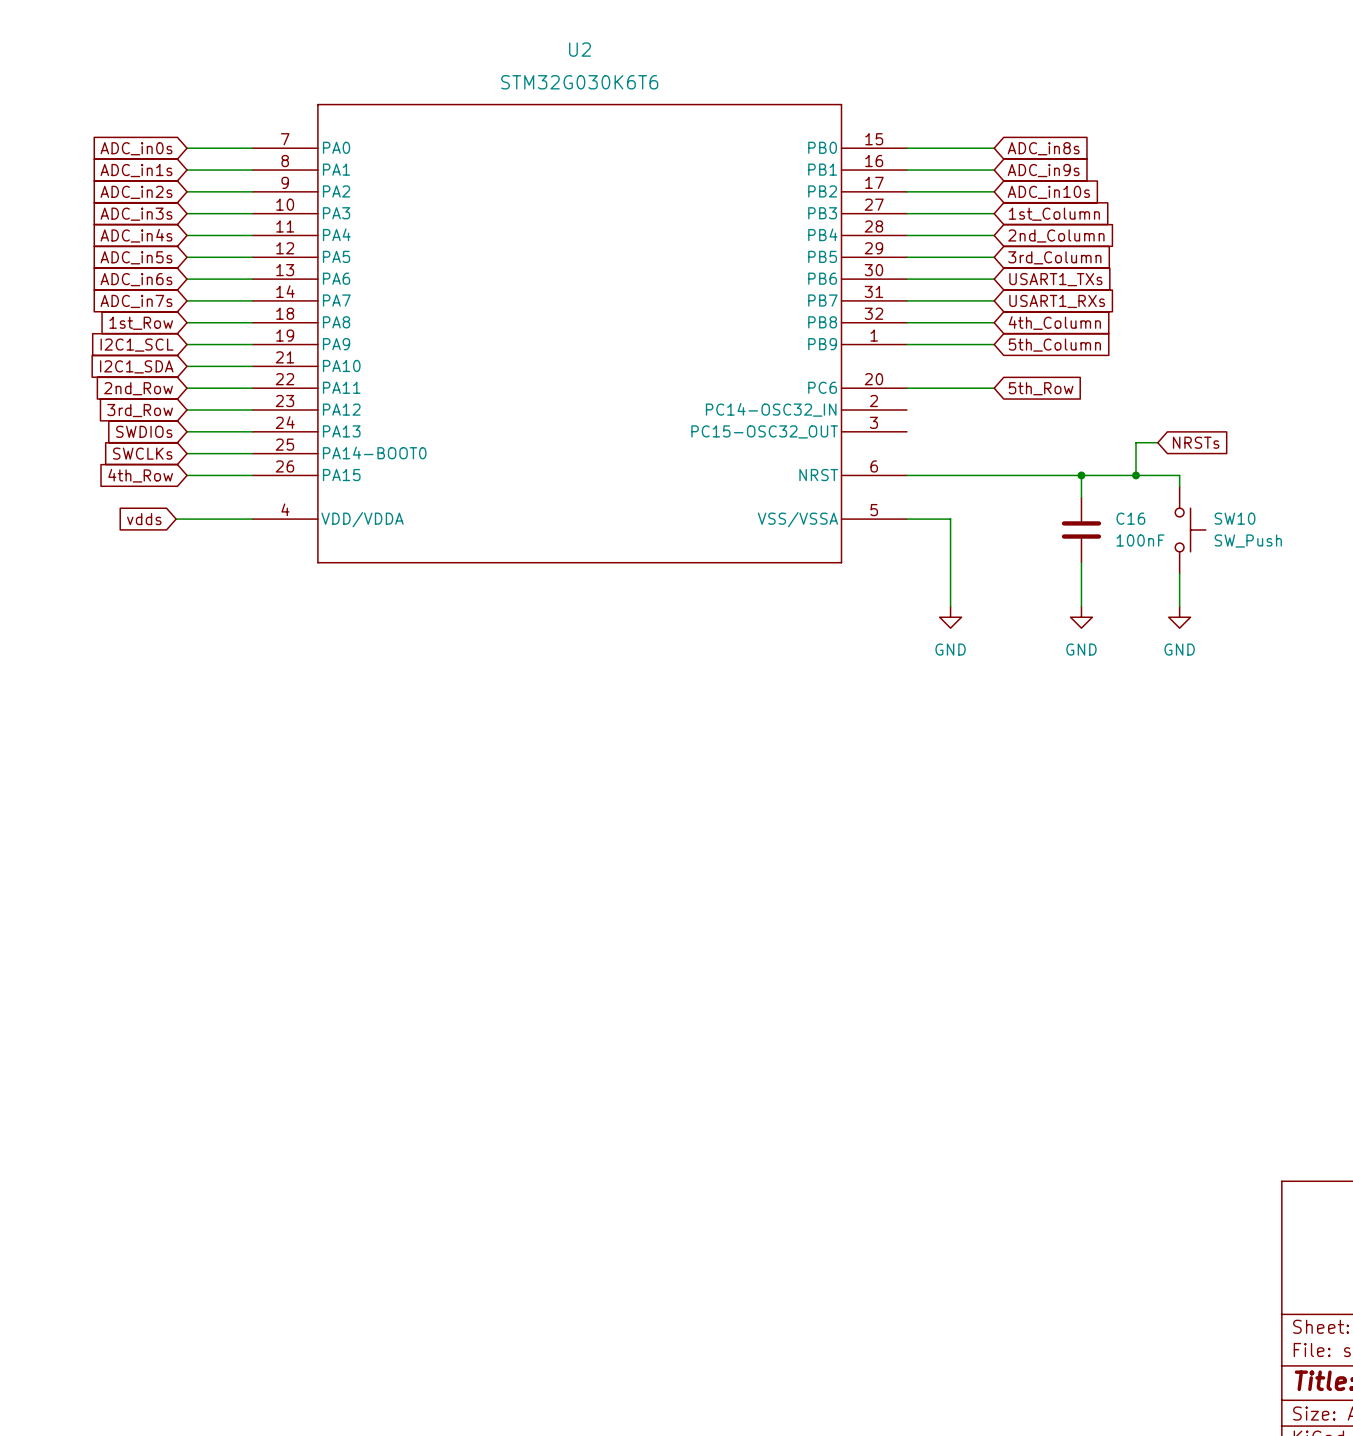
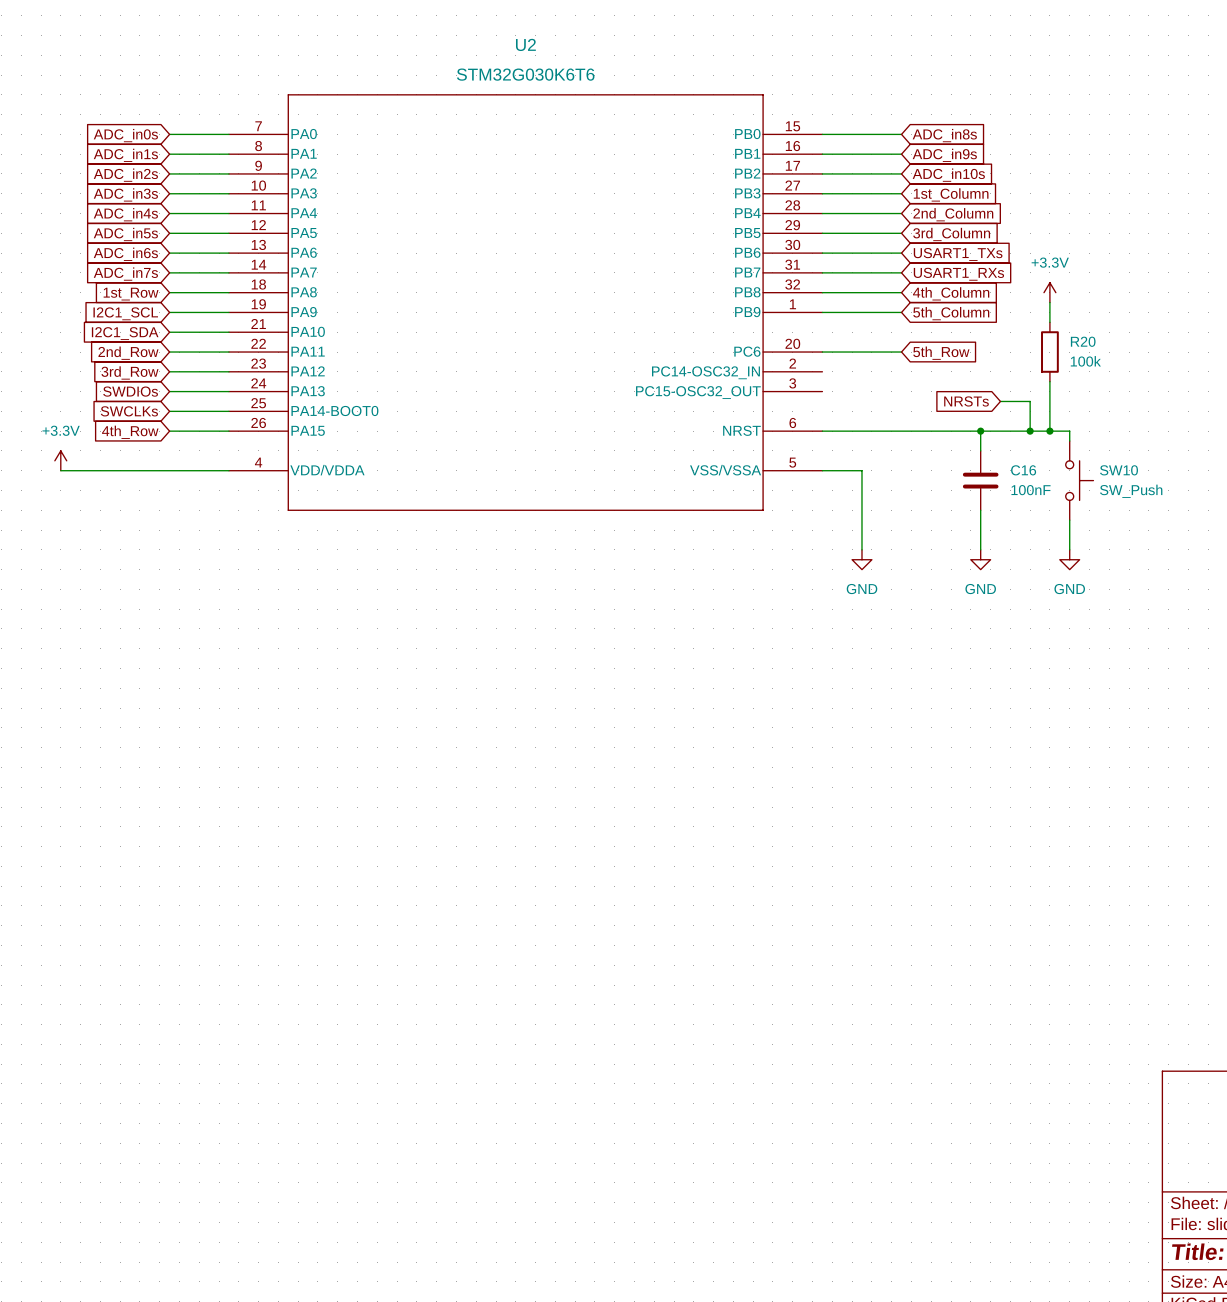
power symbol: none -> +3.3V (1049, 292)
wire: none -> (1049, 302) (1049, 322)
R20: none -> 100k (1049, 352)
wire: none -> (1049, 381) (1049, 431)
wire: (1136, 442) (1157, 442) -> (1030, 401) (1000, 401)
global label rotation: 0° (1196, 442) -> 180° (966, 401)
global label position: NRSTs (1196, 442) -> NRSTs (966, 401)
junction: none -> (1049, 431)
power symbol: none -> +3.3V (60, 460)
wire: none -> (60, 470) (159, 470)
global label: vdds (144, 519) -> none

